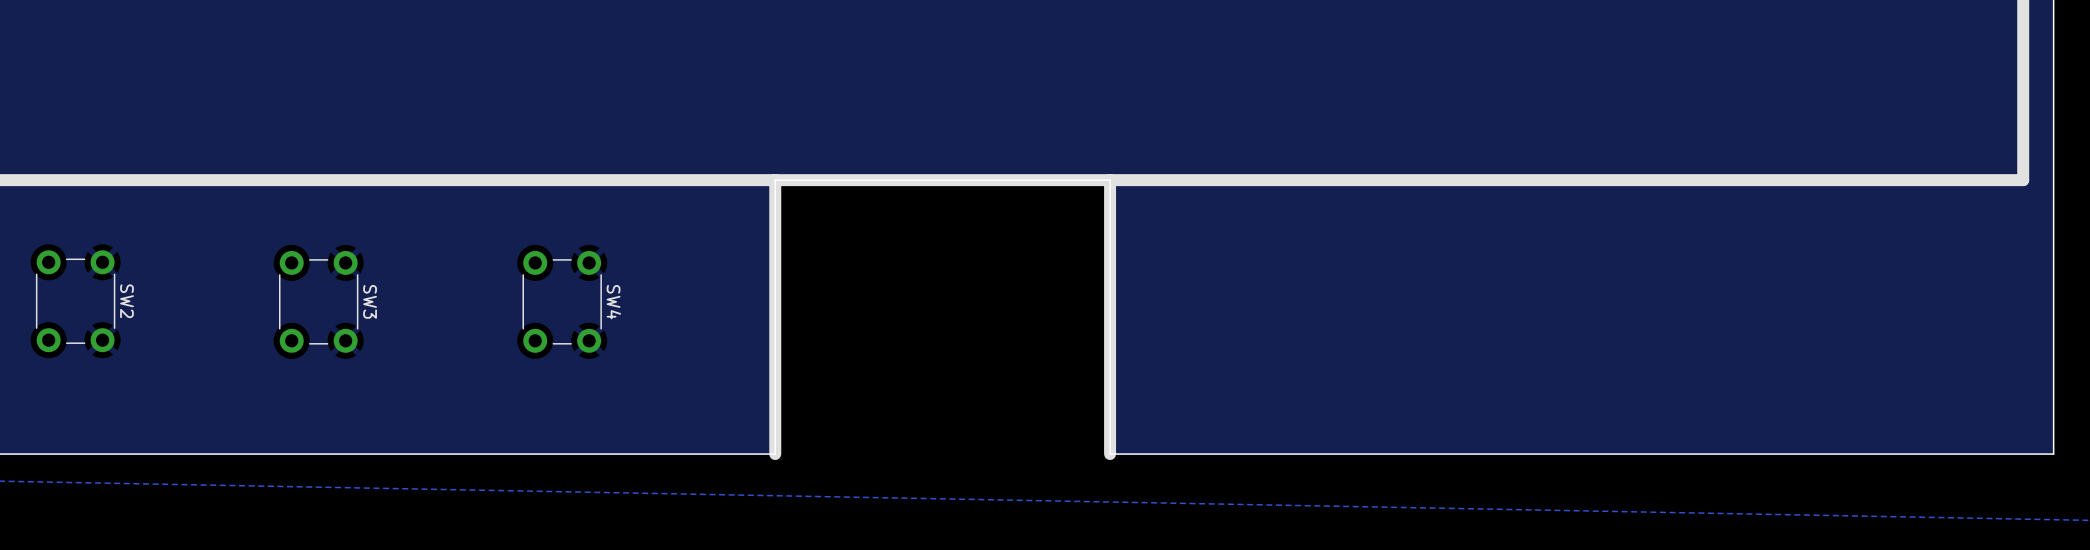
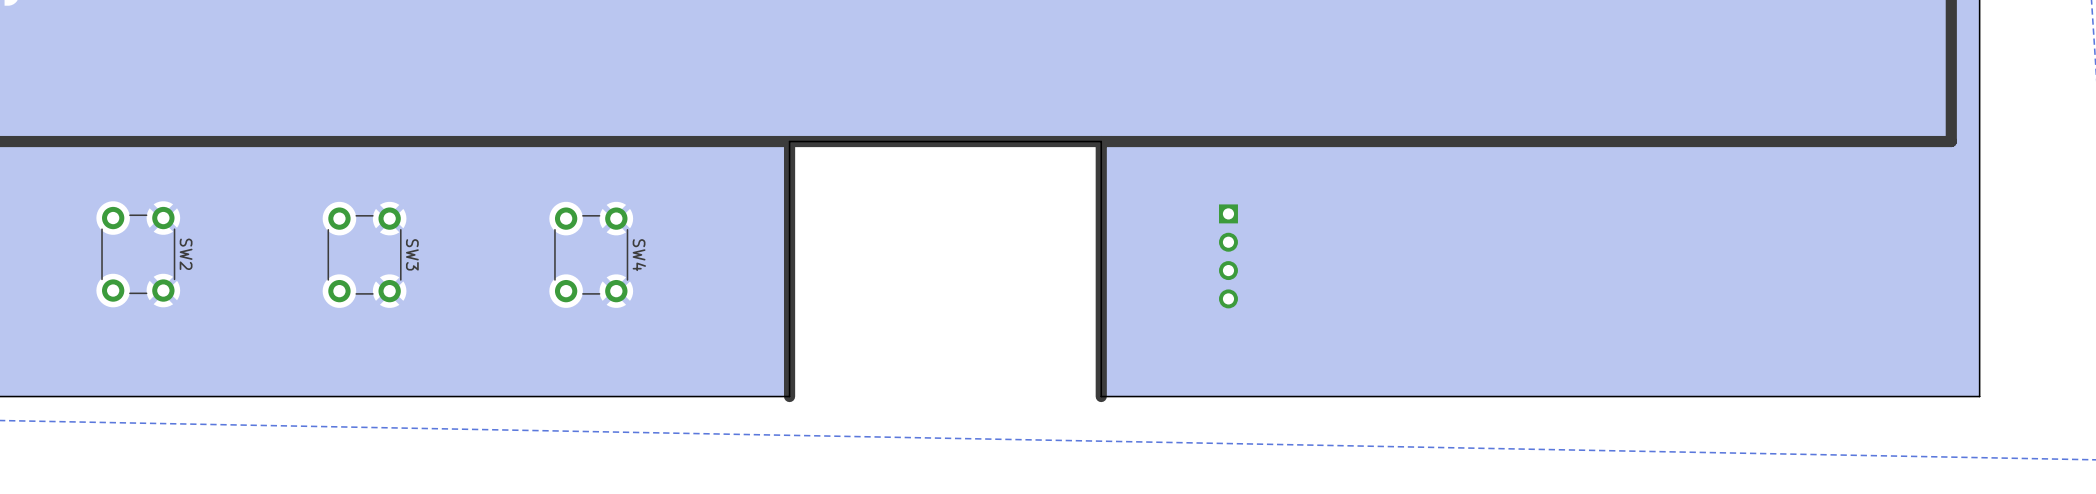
part: none -> (1228, 256)

